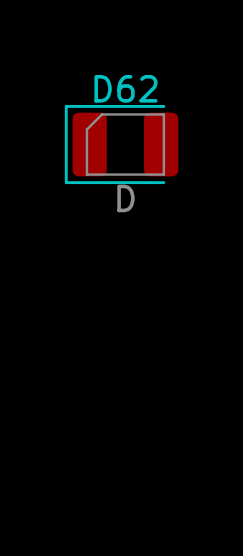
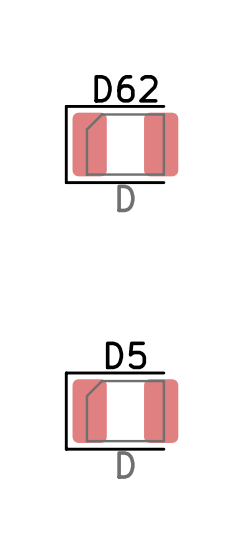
D5: none -> D (121, 411)

